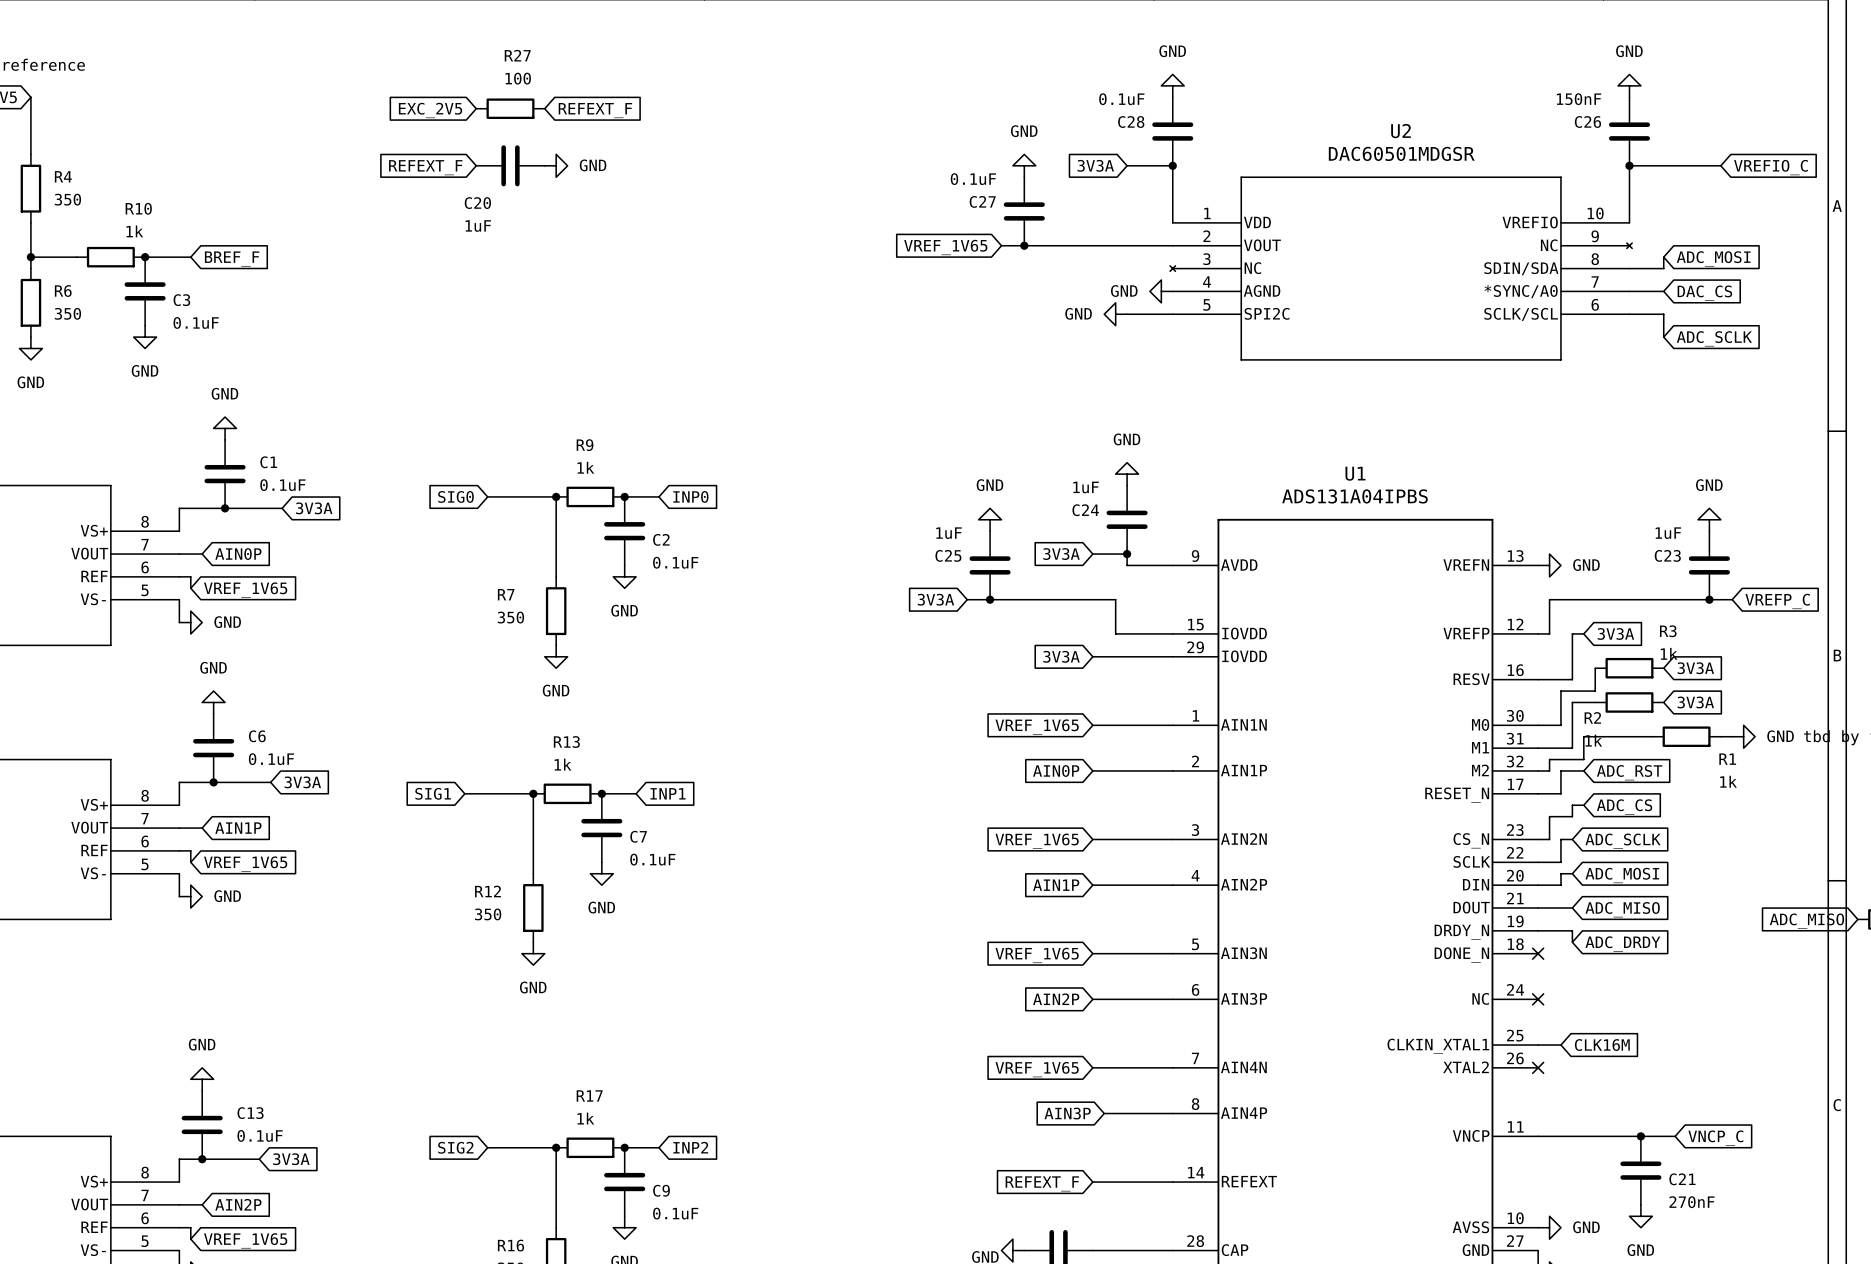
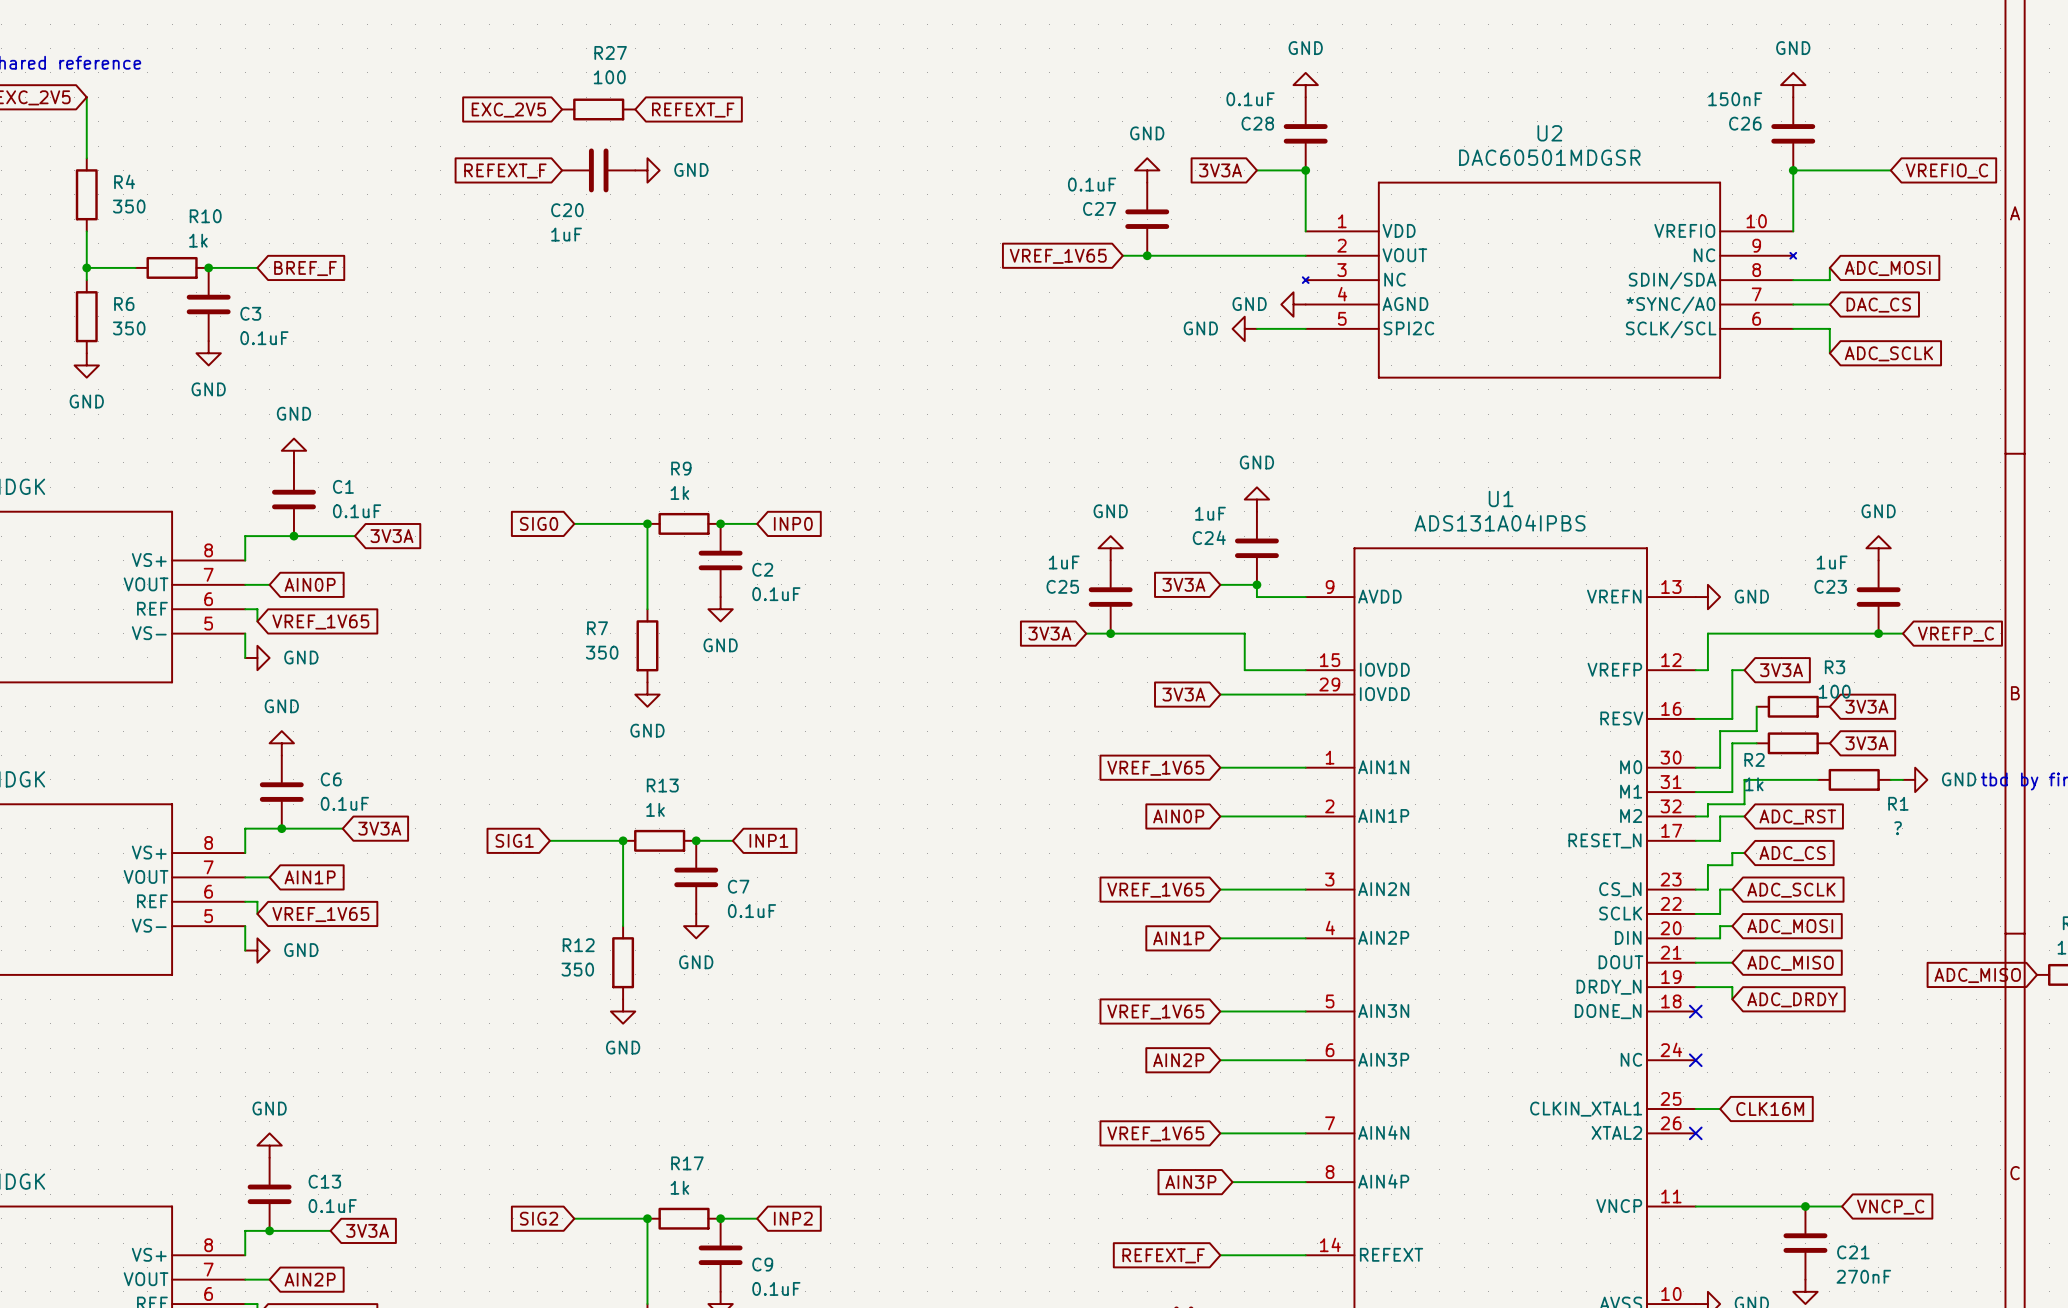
R3 value: 1k (1669, 653) -> 100 (1834, 691)
R1 value: 1k (1728, 781) -> ? (1898, 828)

